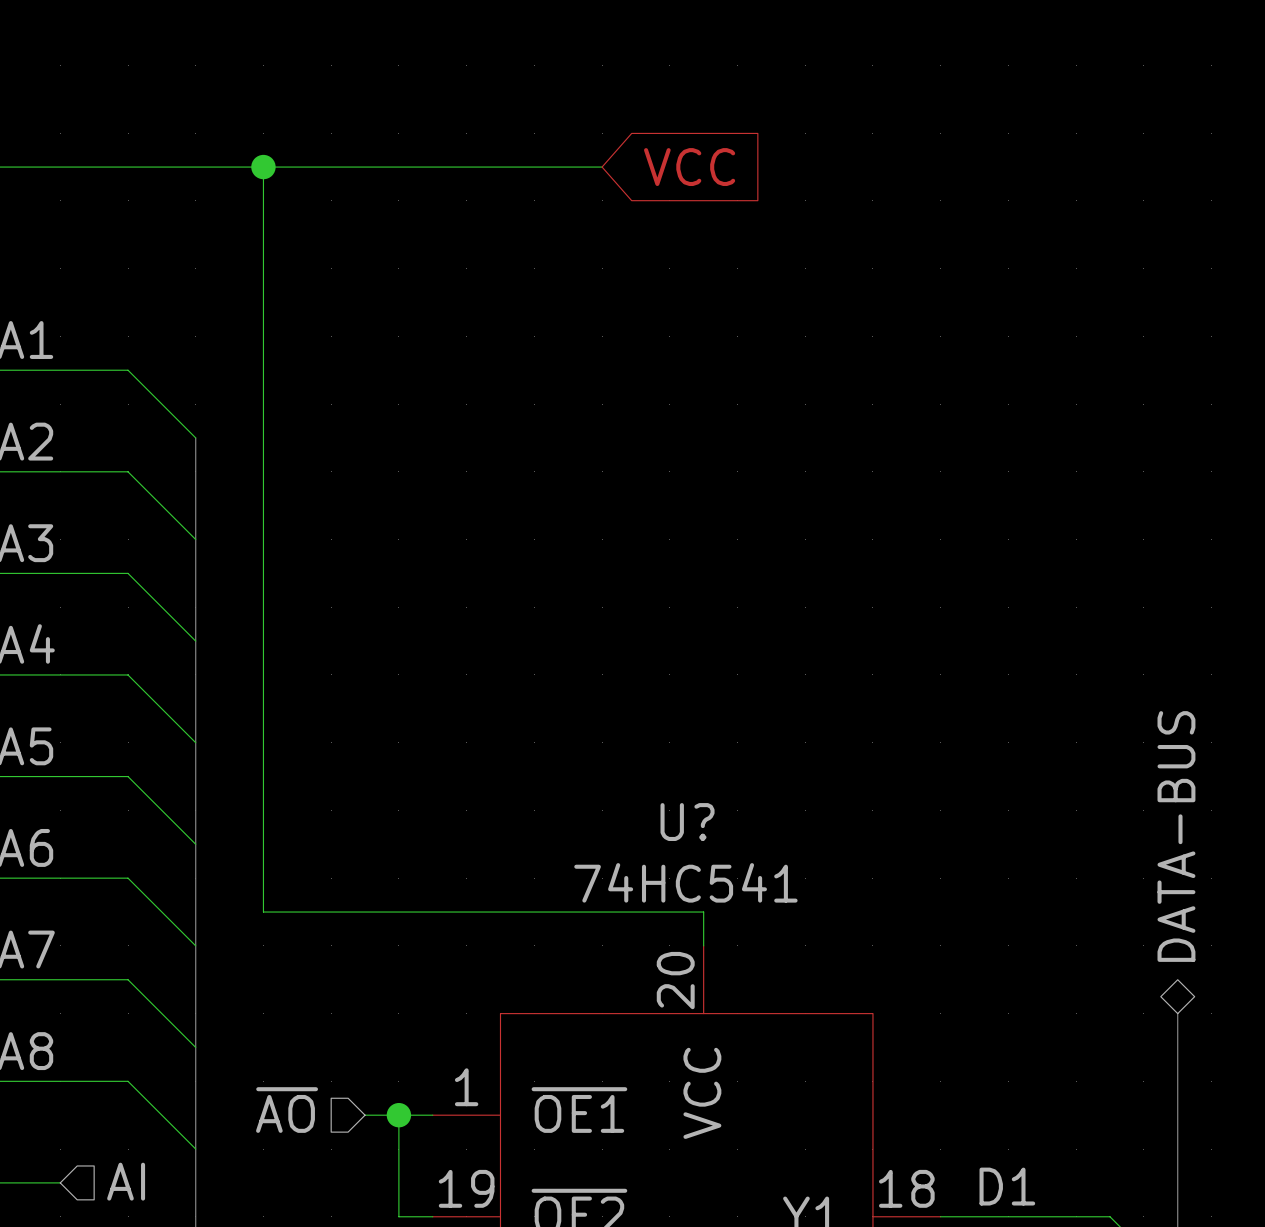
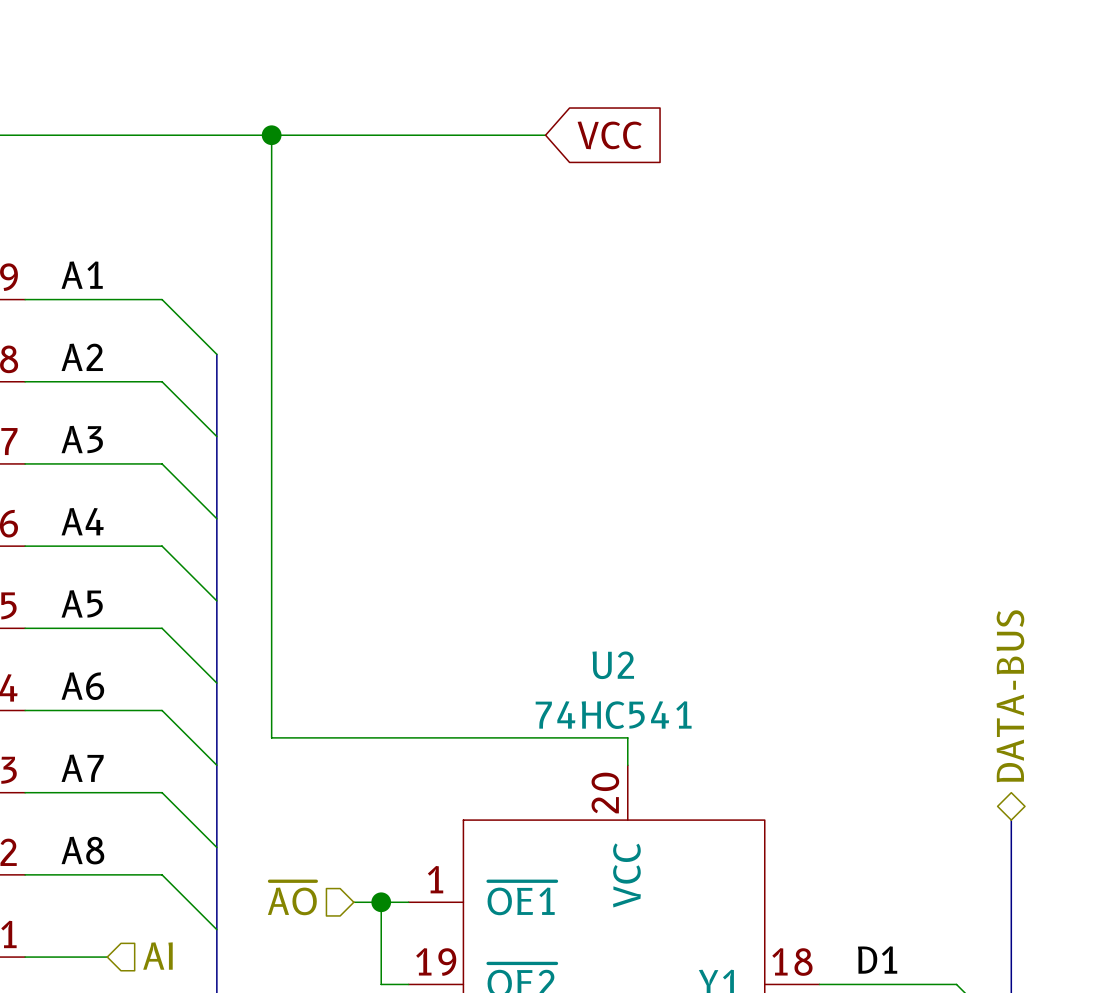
U? name: U? (687, 822) -> U2 (613, 665)

